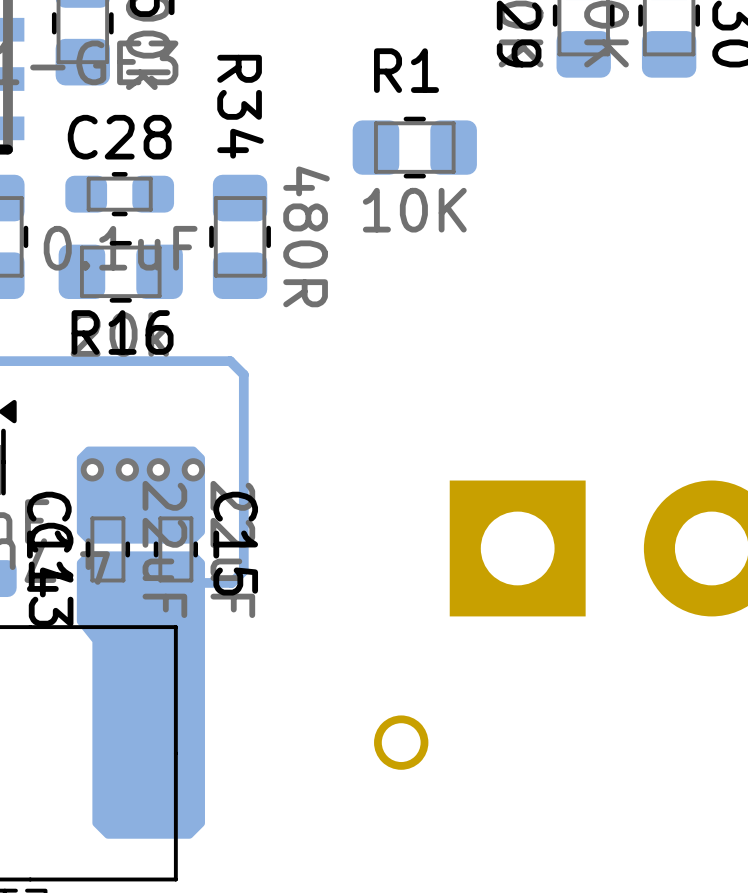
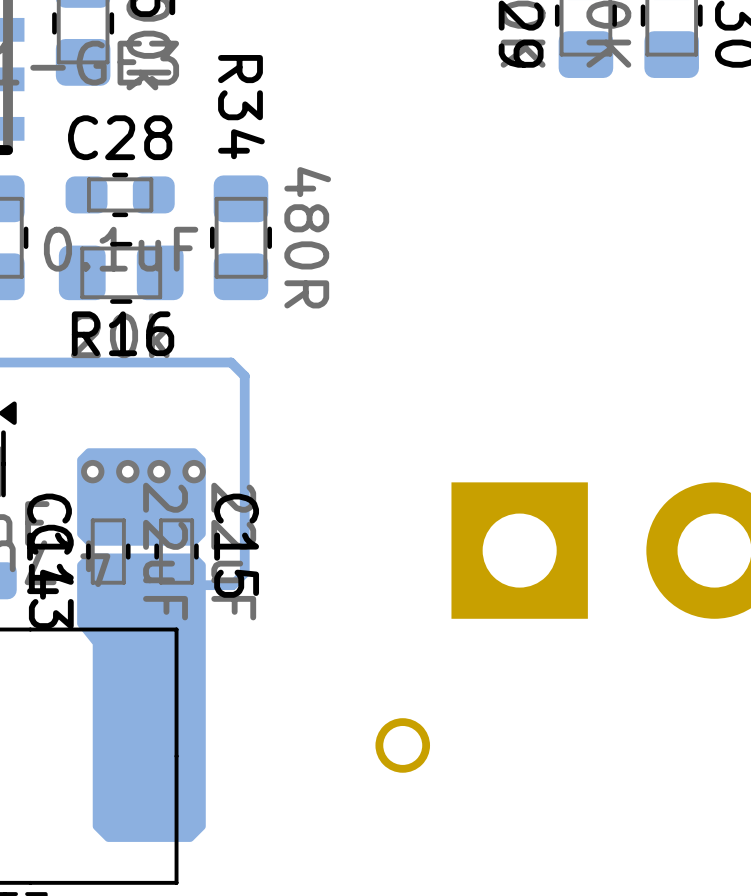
R1: 10K (414, 147) -> none

